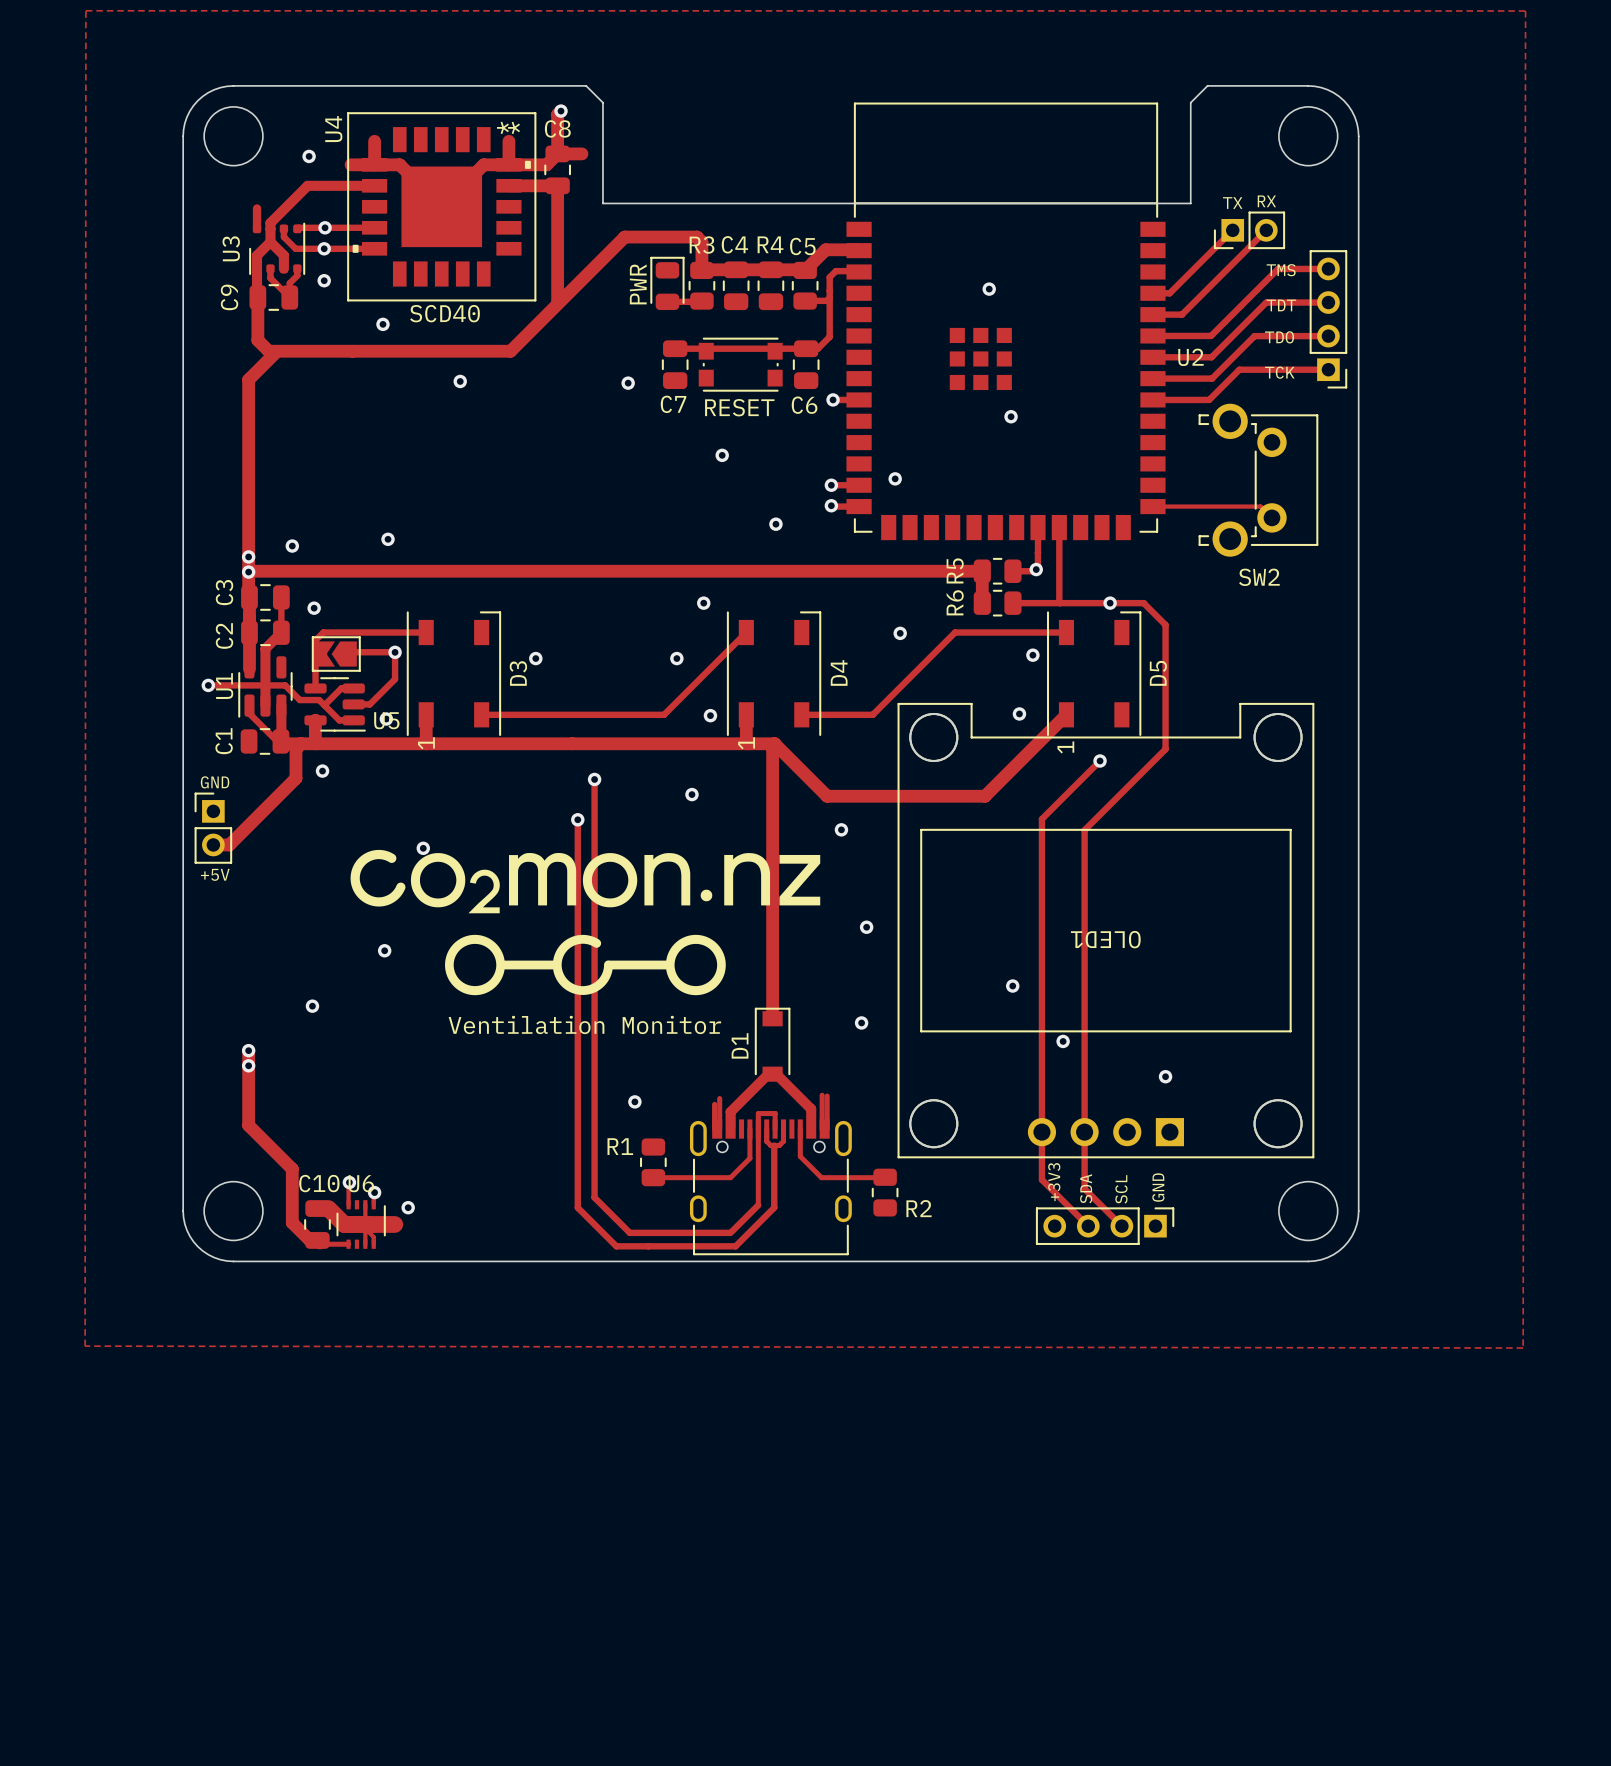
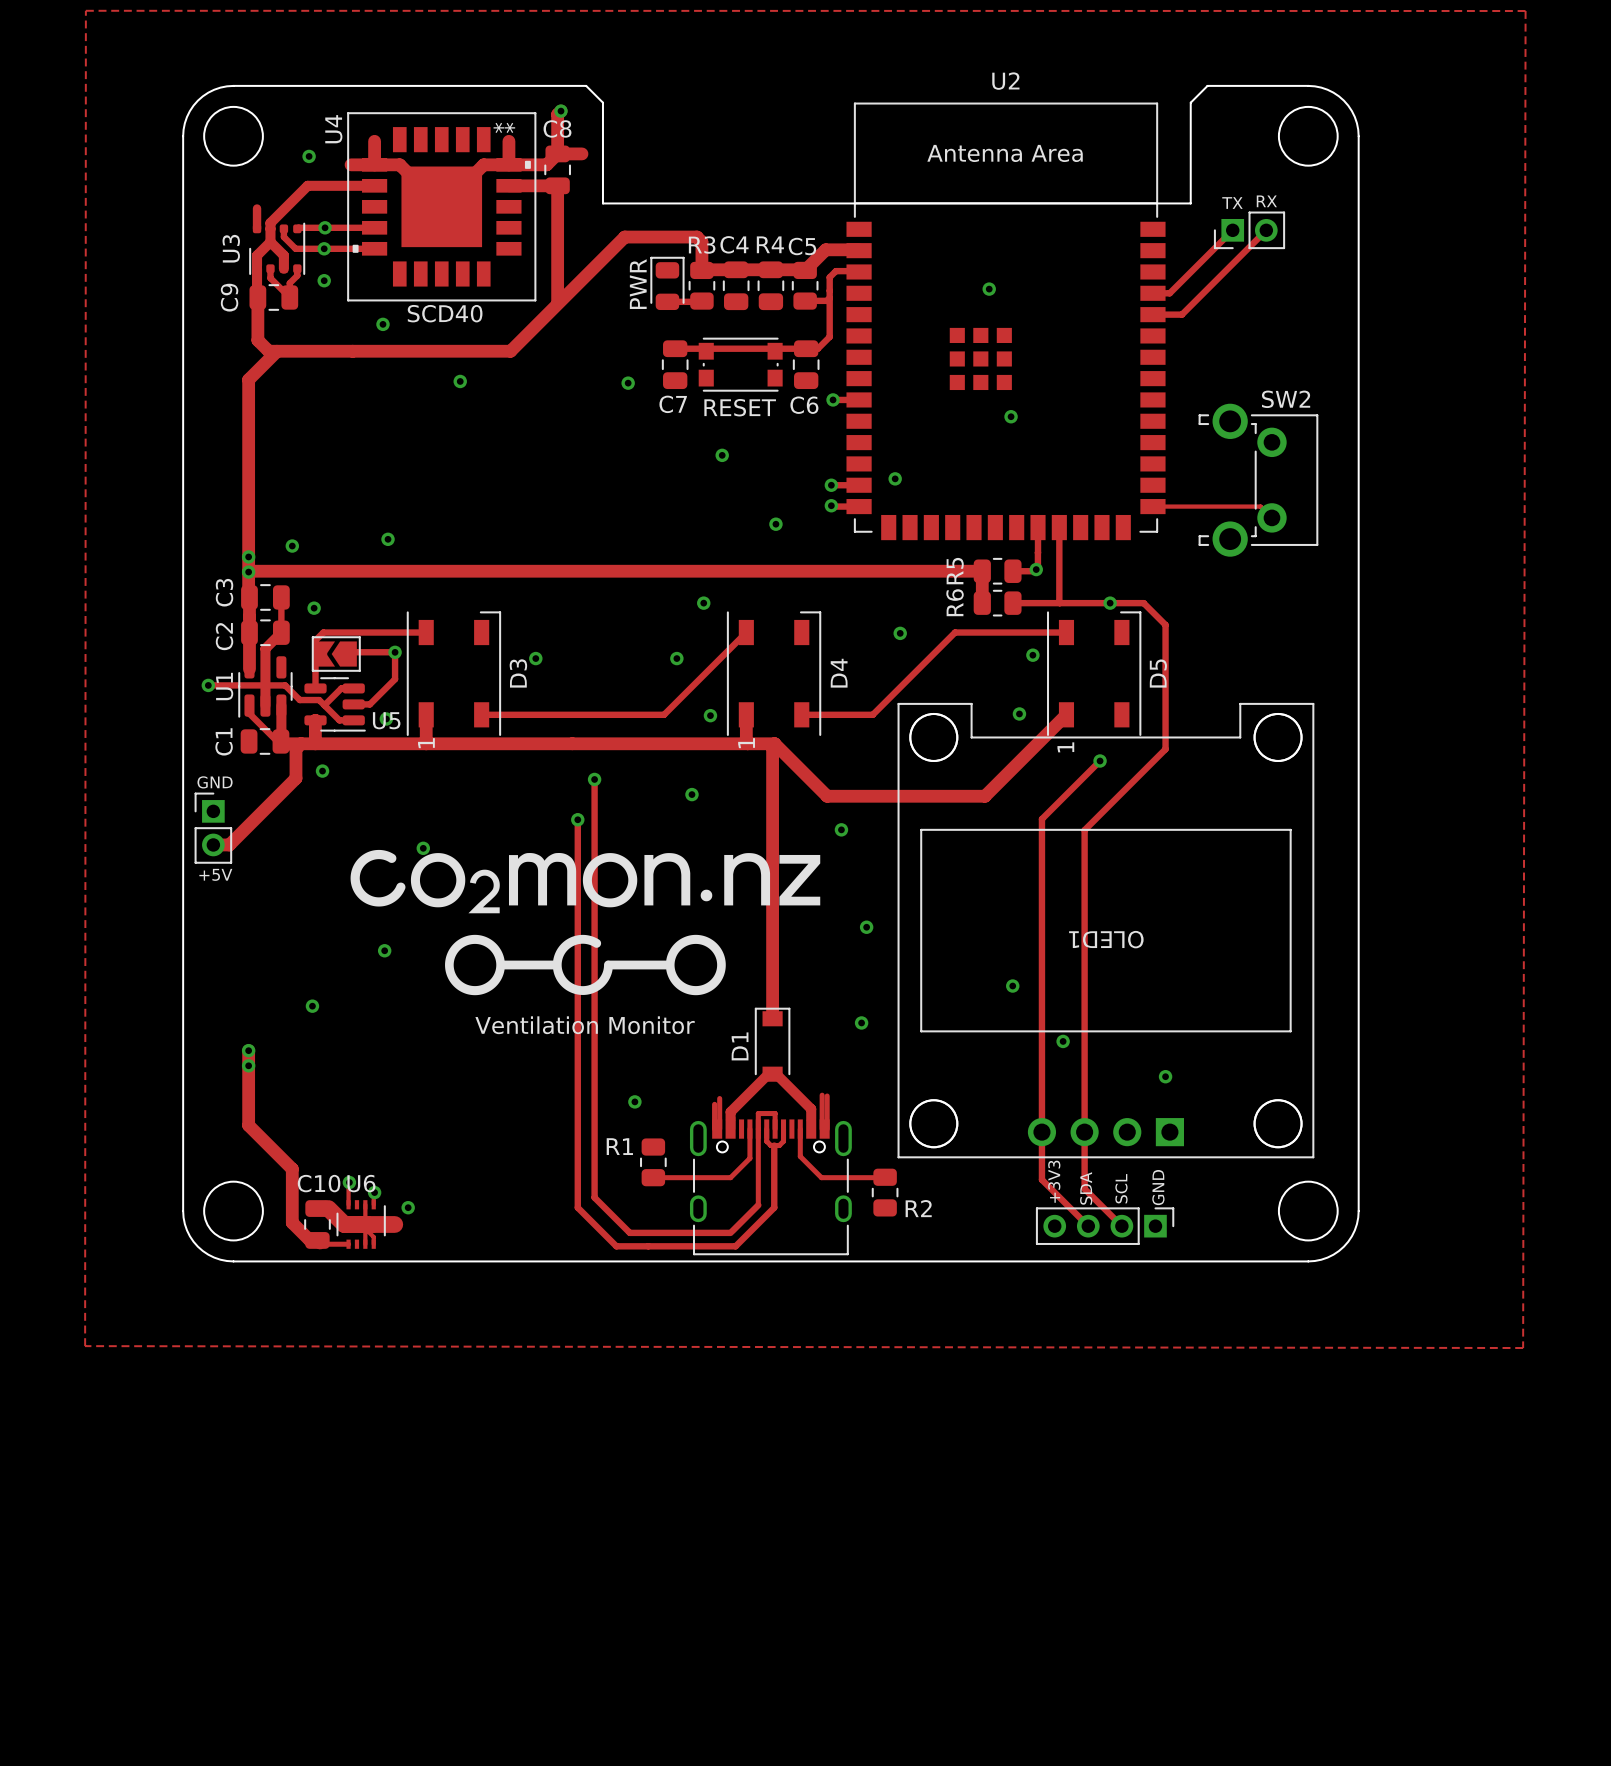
U2 text: none -> Antenna Area (1005, 153)
track: (1328, 268) (1278, 268) (1211, 335) (1152, 335) -> none
text: TMS (1281, 270) -> none
track: (1328, 302) (1266, 302) (1211, 357) (1152, 357) -> none
text: TDT (1281, 305) -> none
part: (1328, 319) -> none
track: (1328, 336) (1254, 336) (1212, 378) (1152, 378) -> none
text: TDO (1279, 337) -> none
U2 name position: U2 (1190, 357) -> U2 (1005, 81)
track: (1328, 369) (1239, 369) (1209, 399) (1152, 399) -> none
text: TCK (1279, 372) -> none
SW2 name position: SW2 (1259, 577) -> SW2 (1286, 399)

